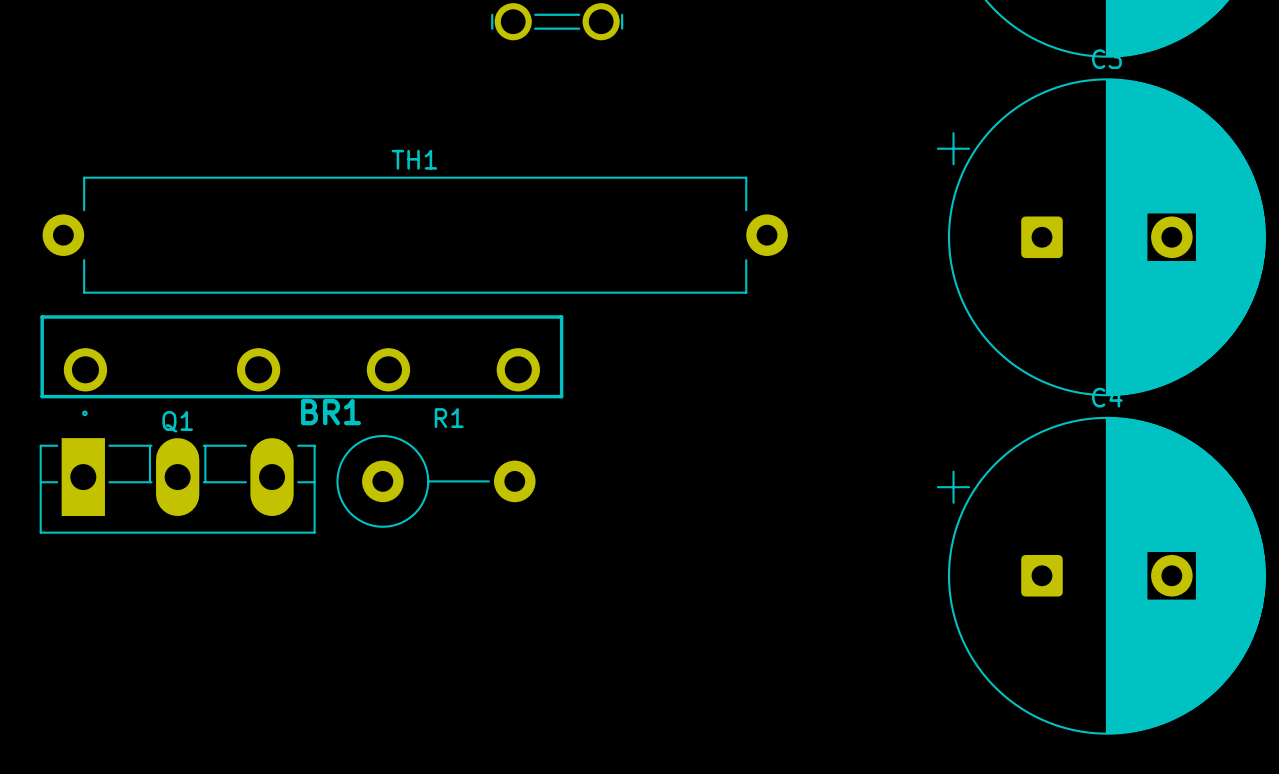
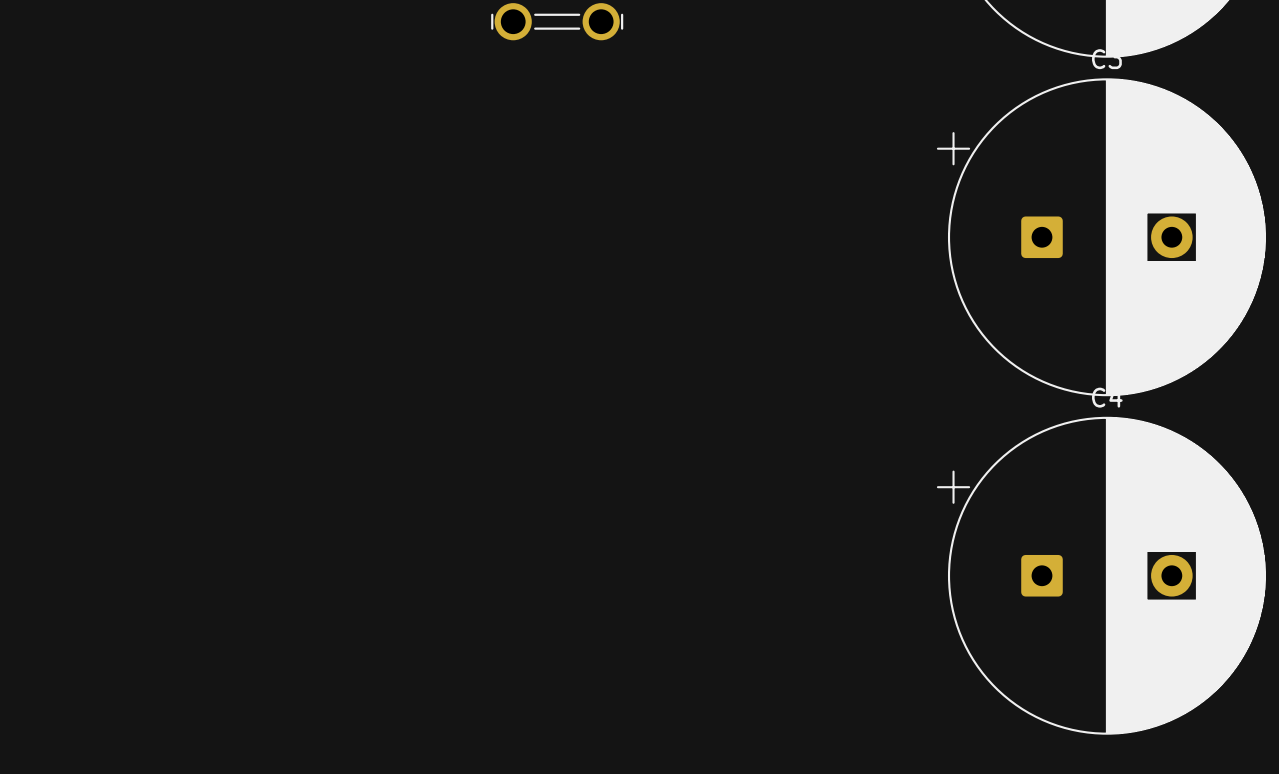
TH1: (415, 235) -> none
BR1: (301, 365) -> none
R1: (435, 481) -> none
Q1: (177, 485) -> none

